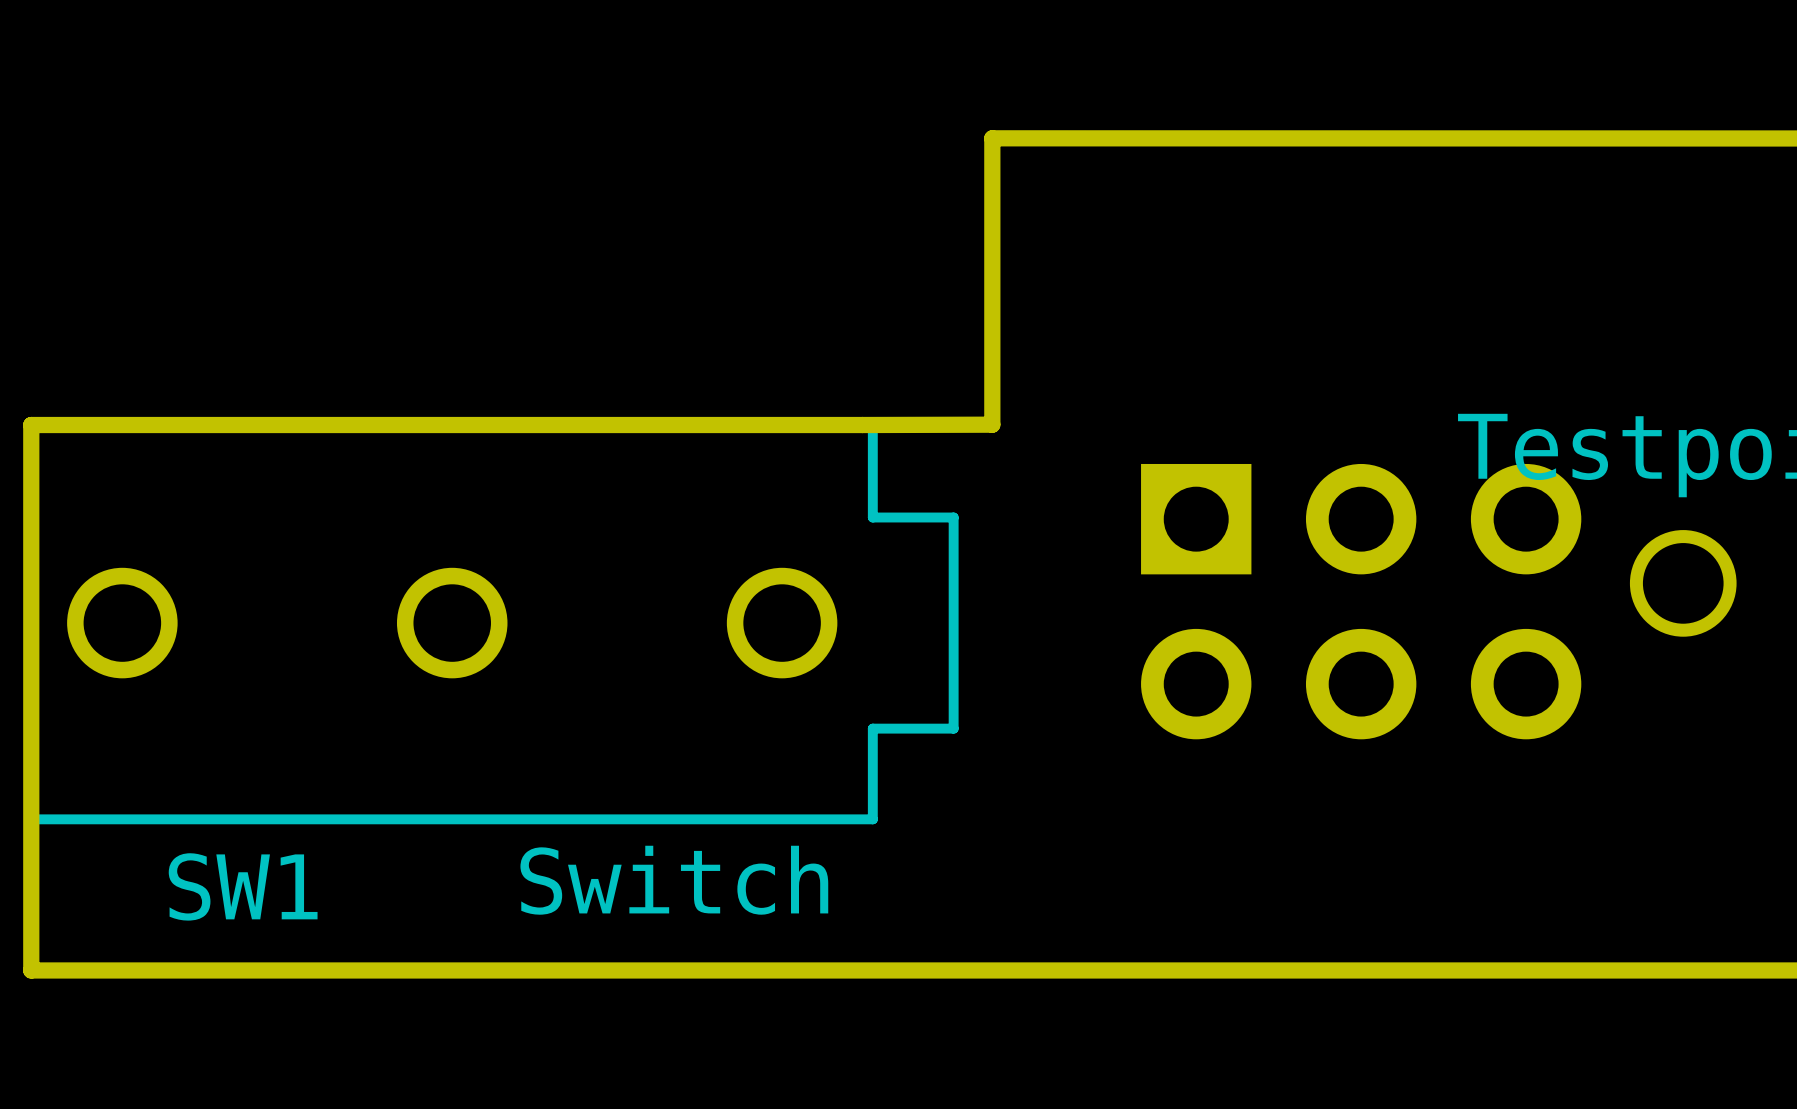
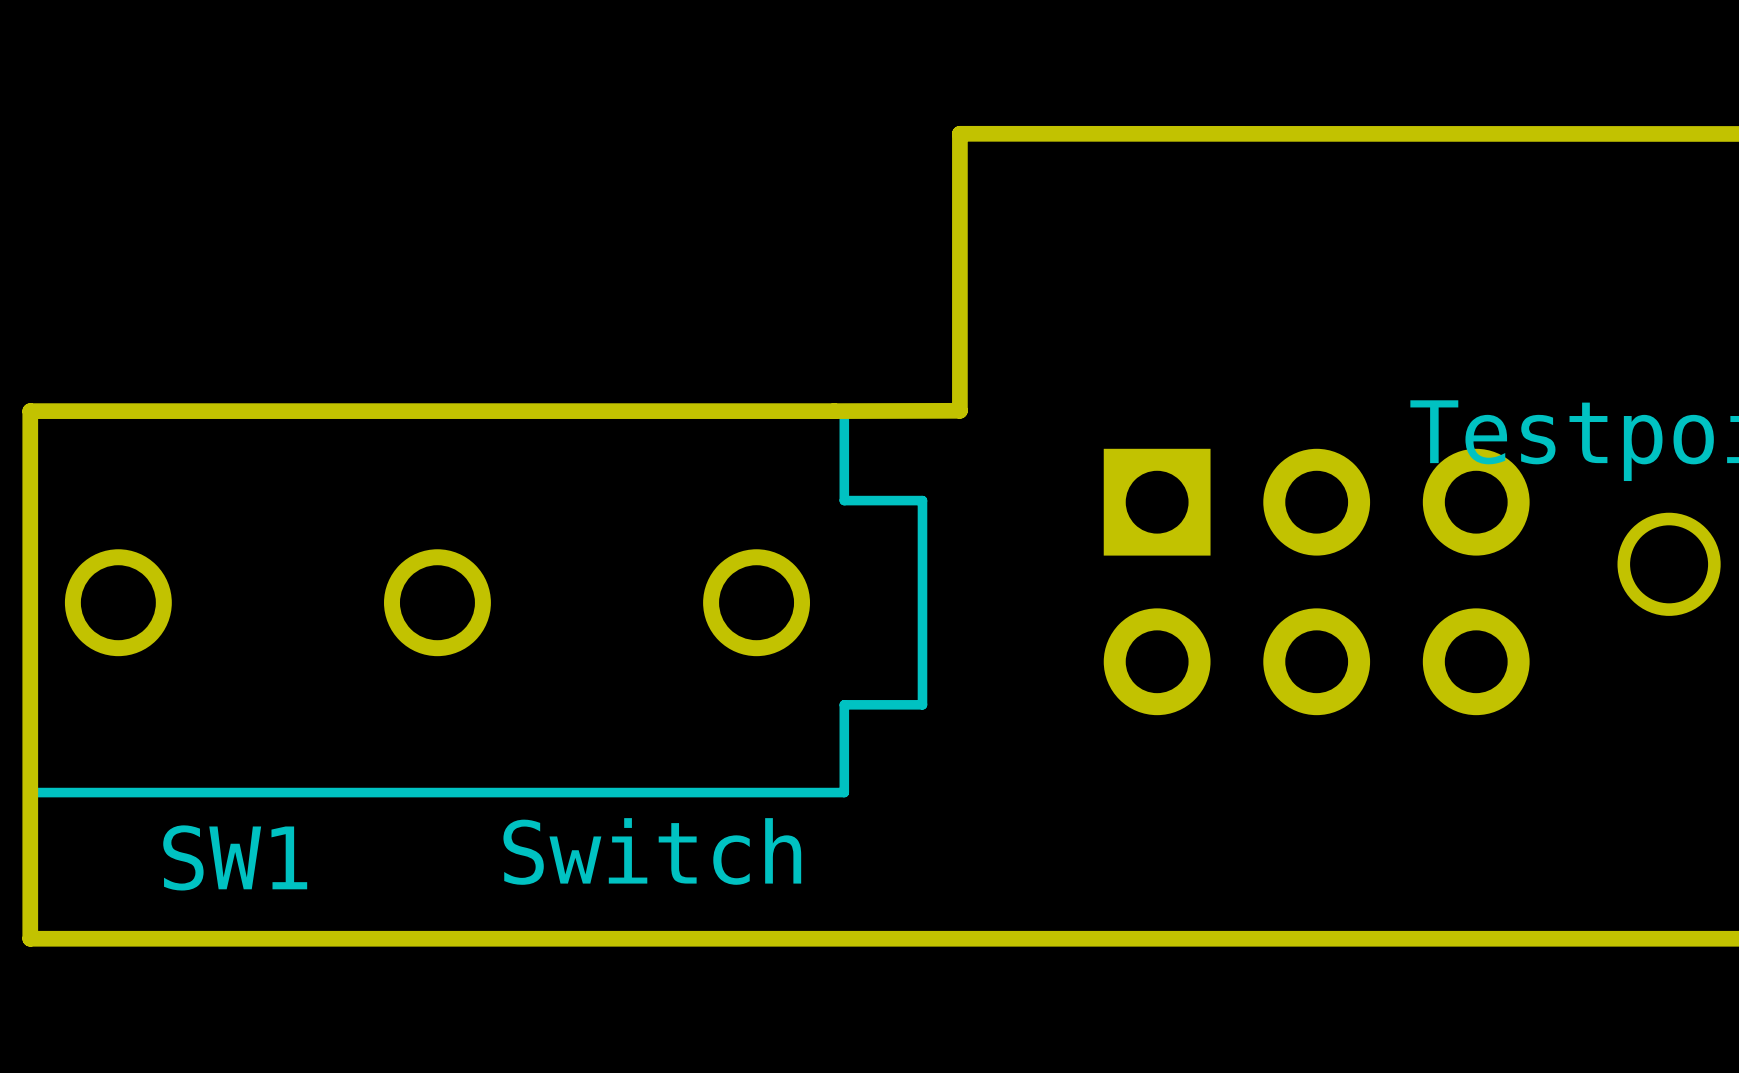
round board edge position: (1683, 583) -> (1669, 564)

